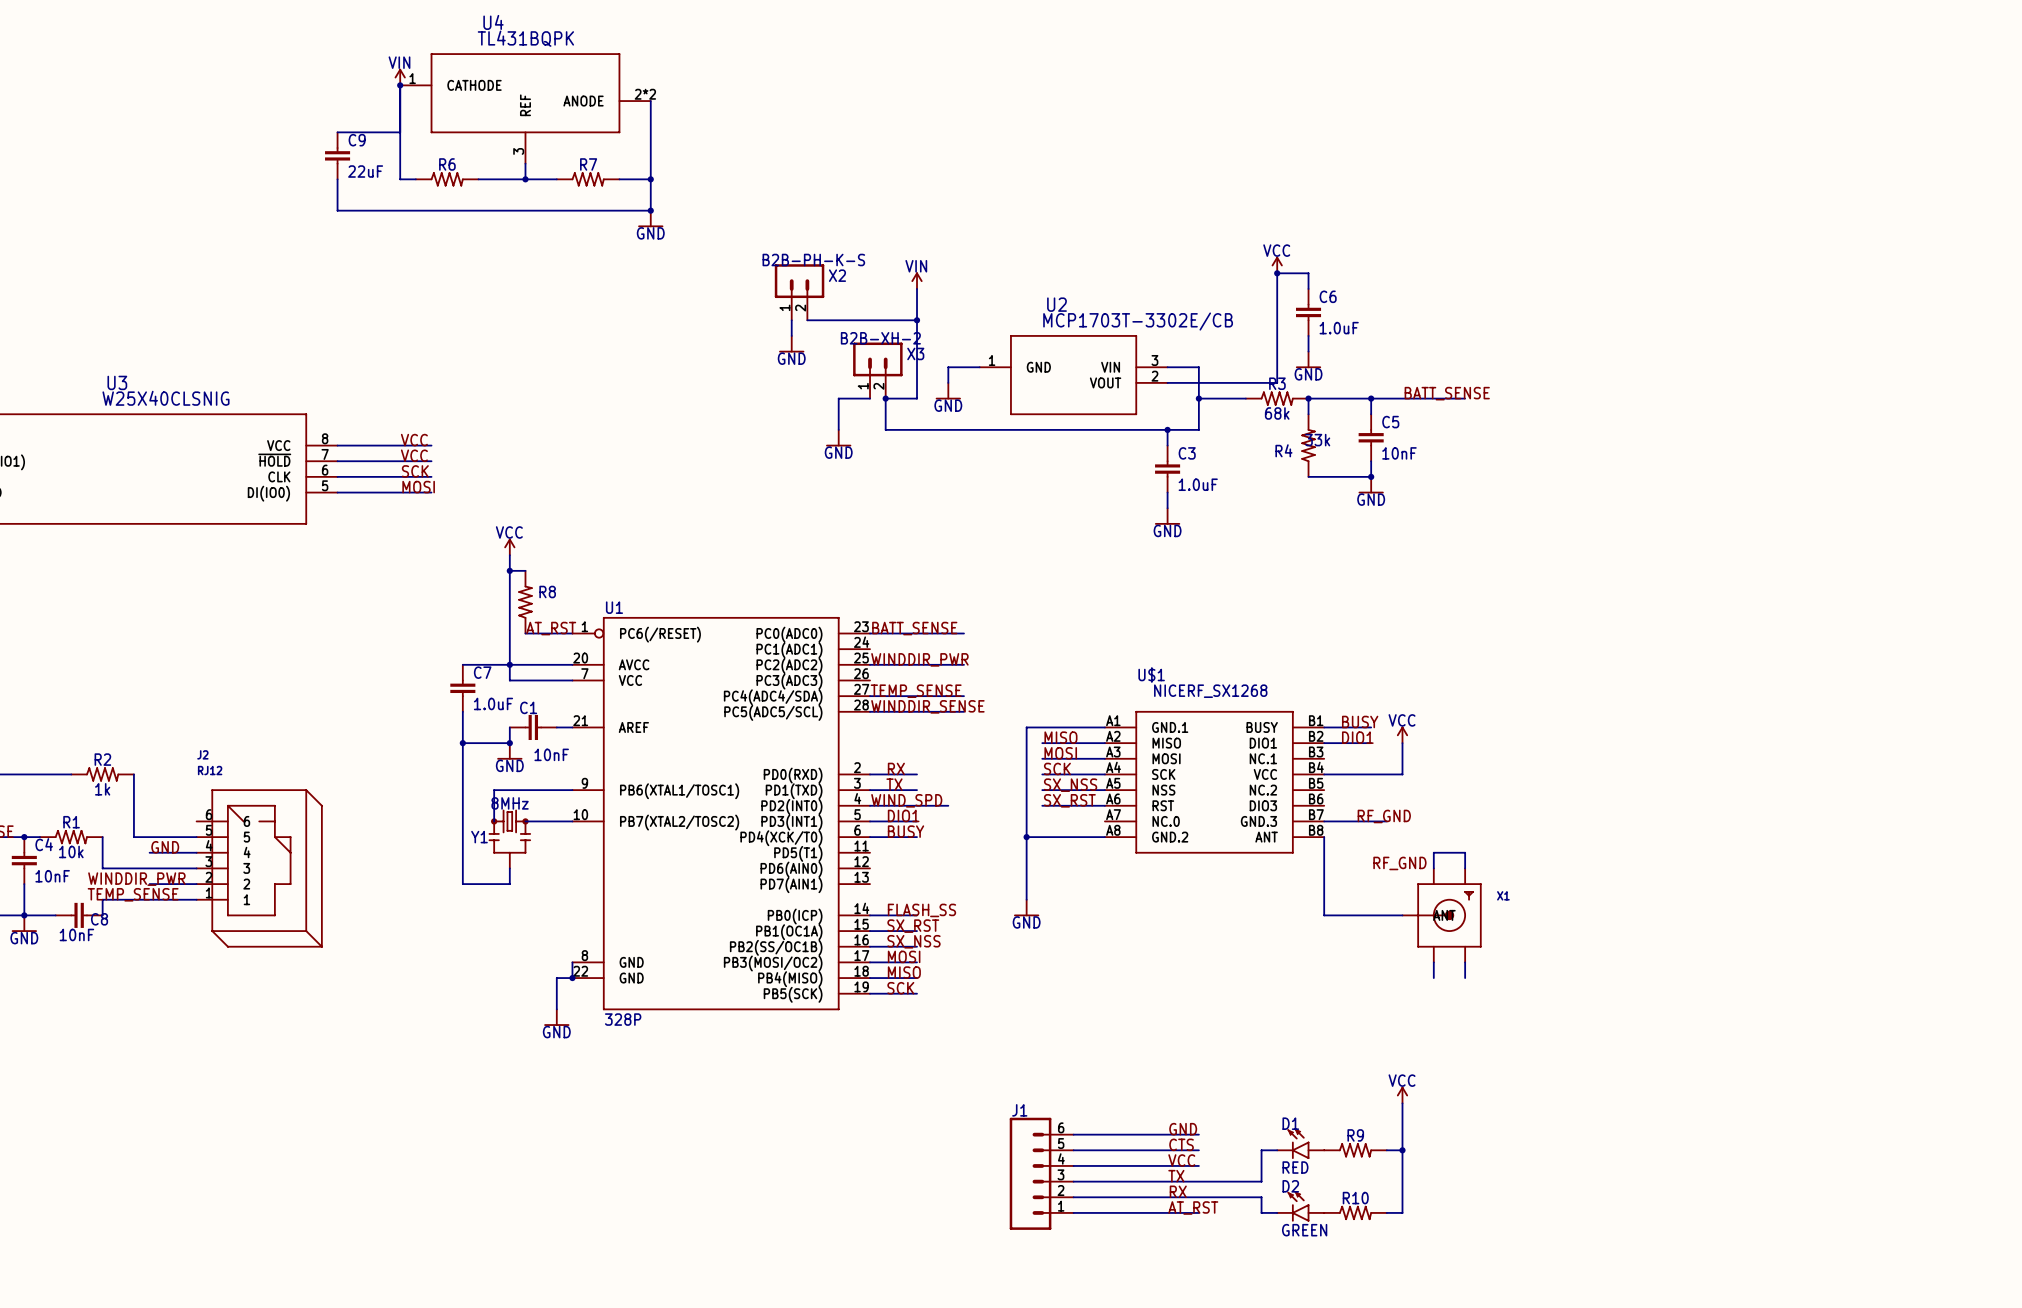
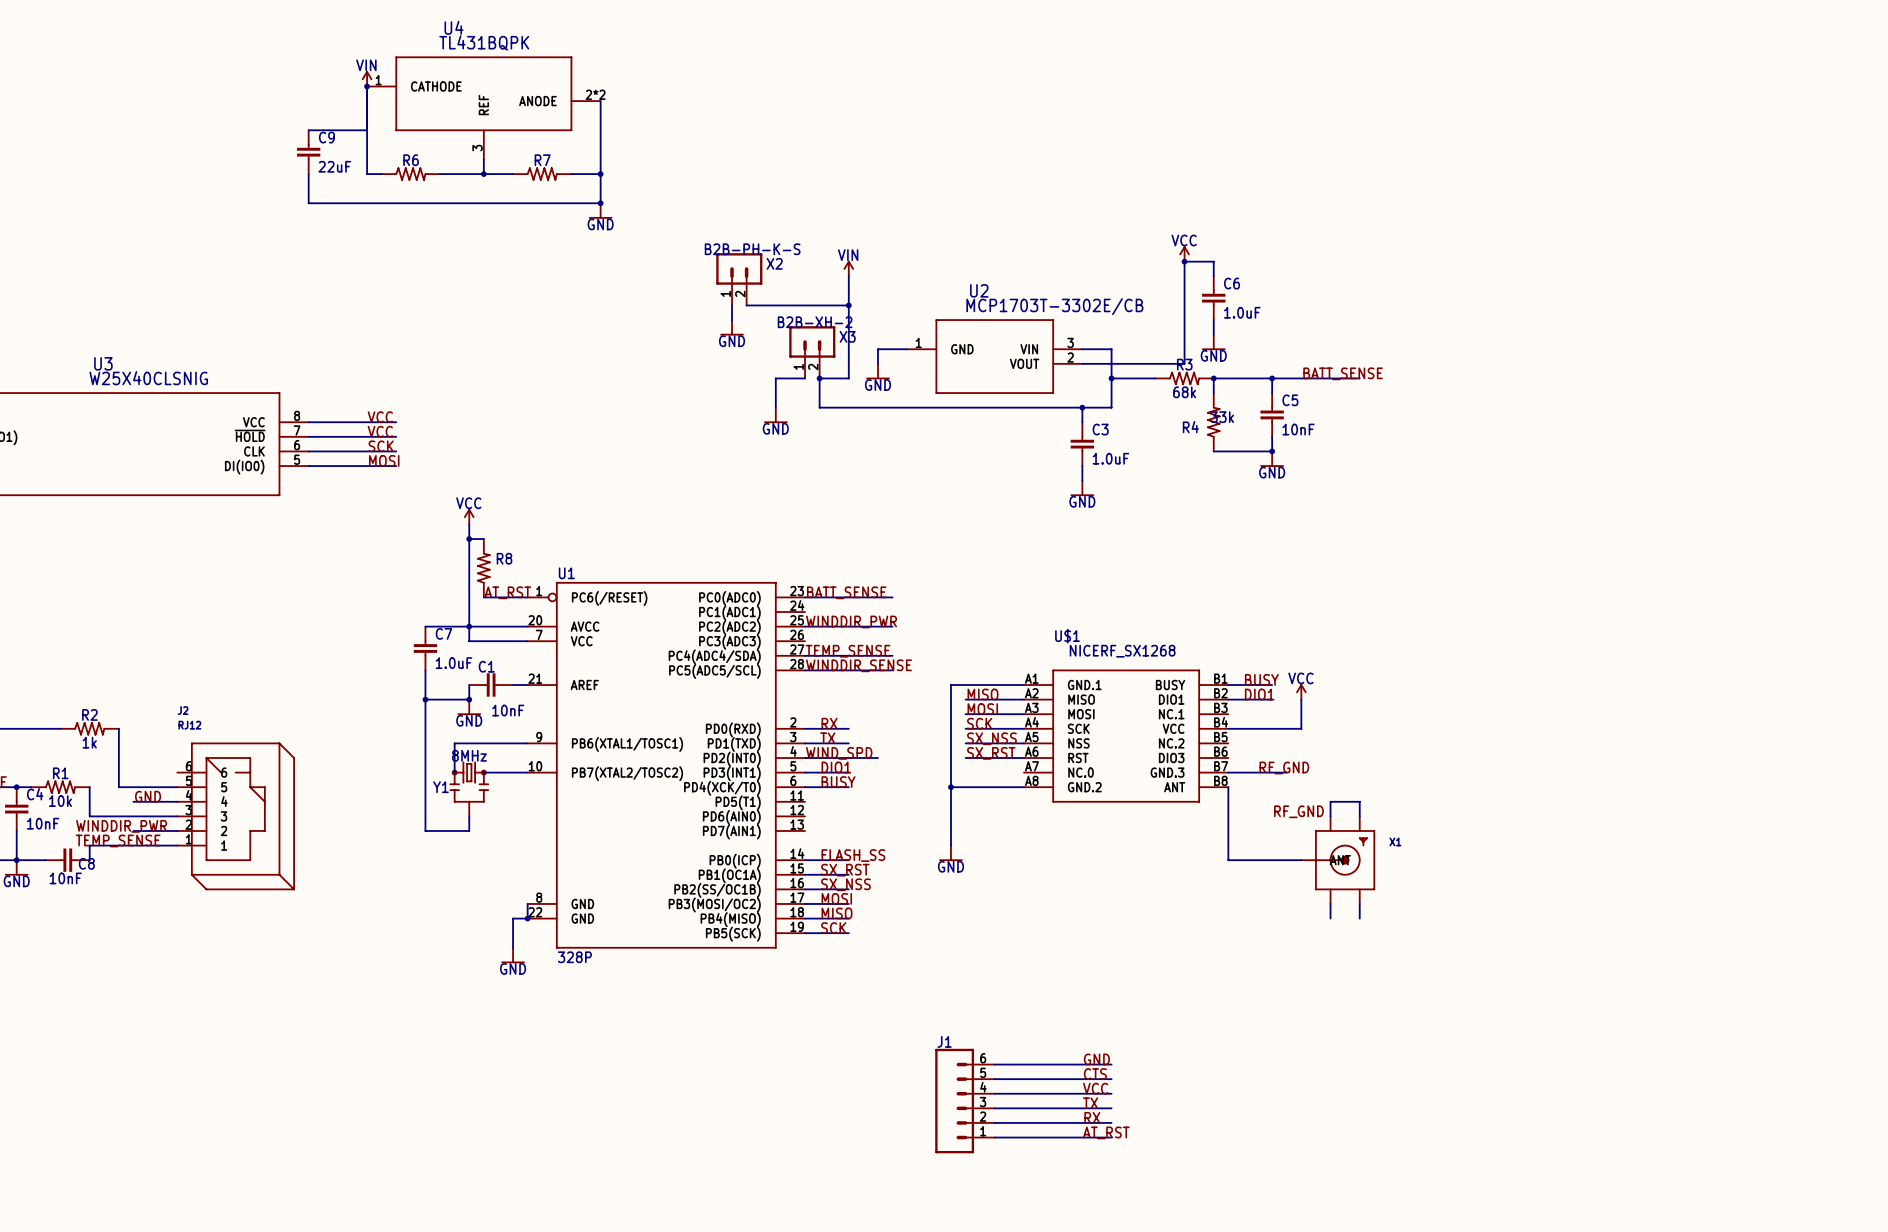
power symbol: VCC (1402, 1095) -> none
wire: (1402, 1103) (1402, 1212) (1386, 1212) -> none
D1: RED (1300, 1143) -> none
wire: (1277, 1150) (1261, 1150) (1261, 1181) (1198, 1181) -> none
R9: (1355, 1150) -> none
wire: (1386, 1150) (1402, 1150) -> none
junction: (1402, 1150) -> none
wire: (1198, 1197) (1261, 1197) (1261, 1212) (1277, 1212) -> none
D2: GREEN (1300, 1206) -> none
R10: (1355, 1212) -> none

